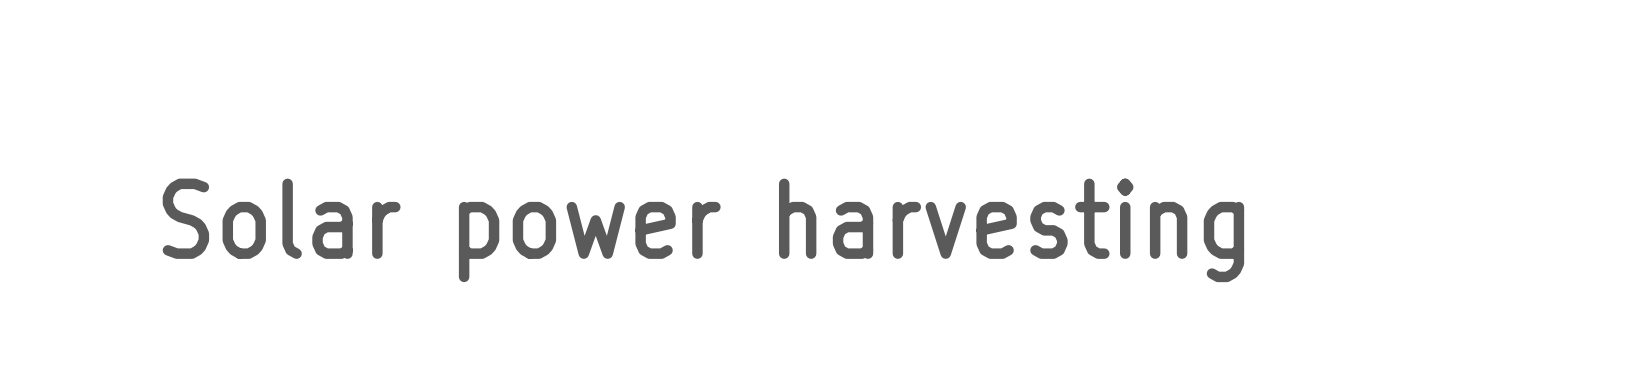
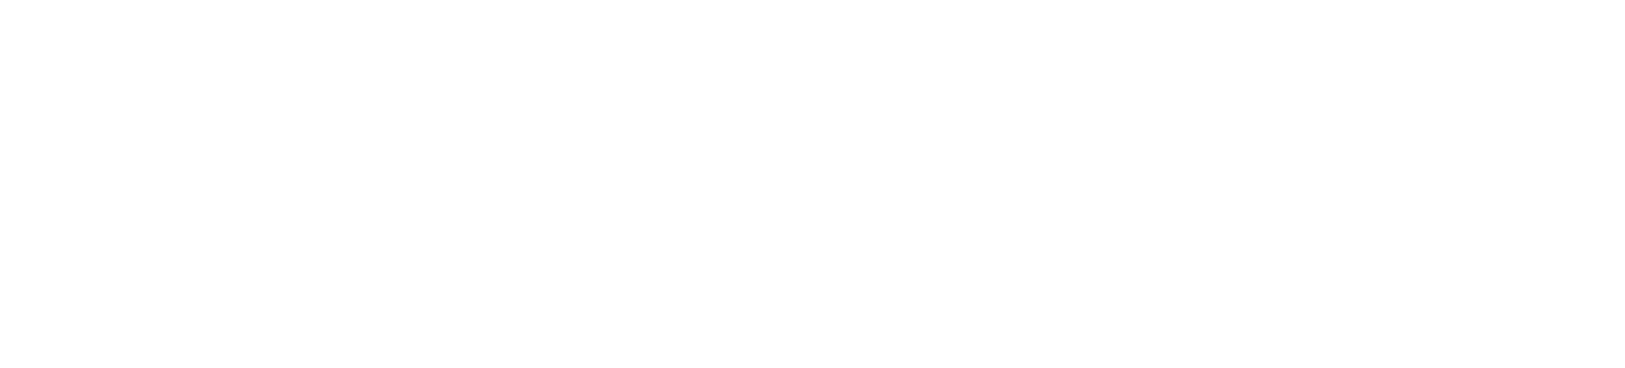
text: Solar power harvesting (703, 230) -> none

